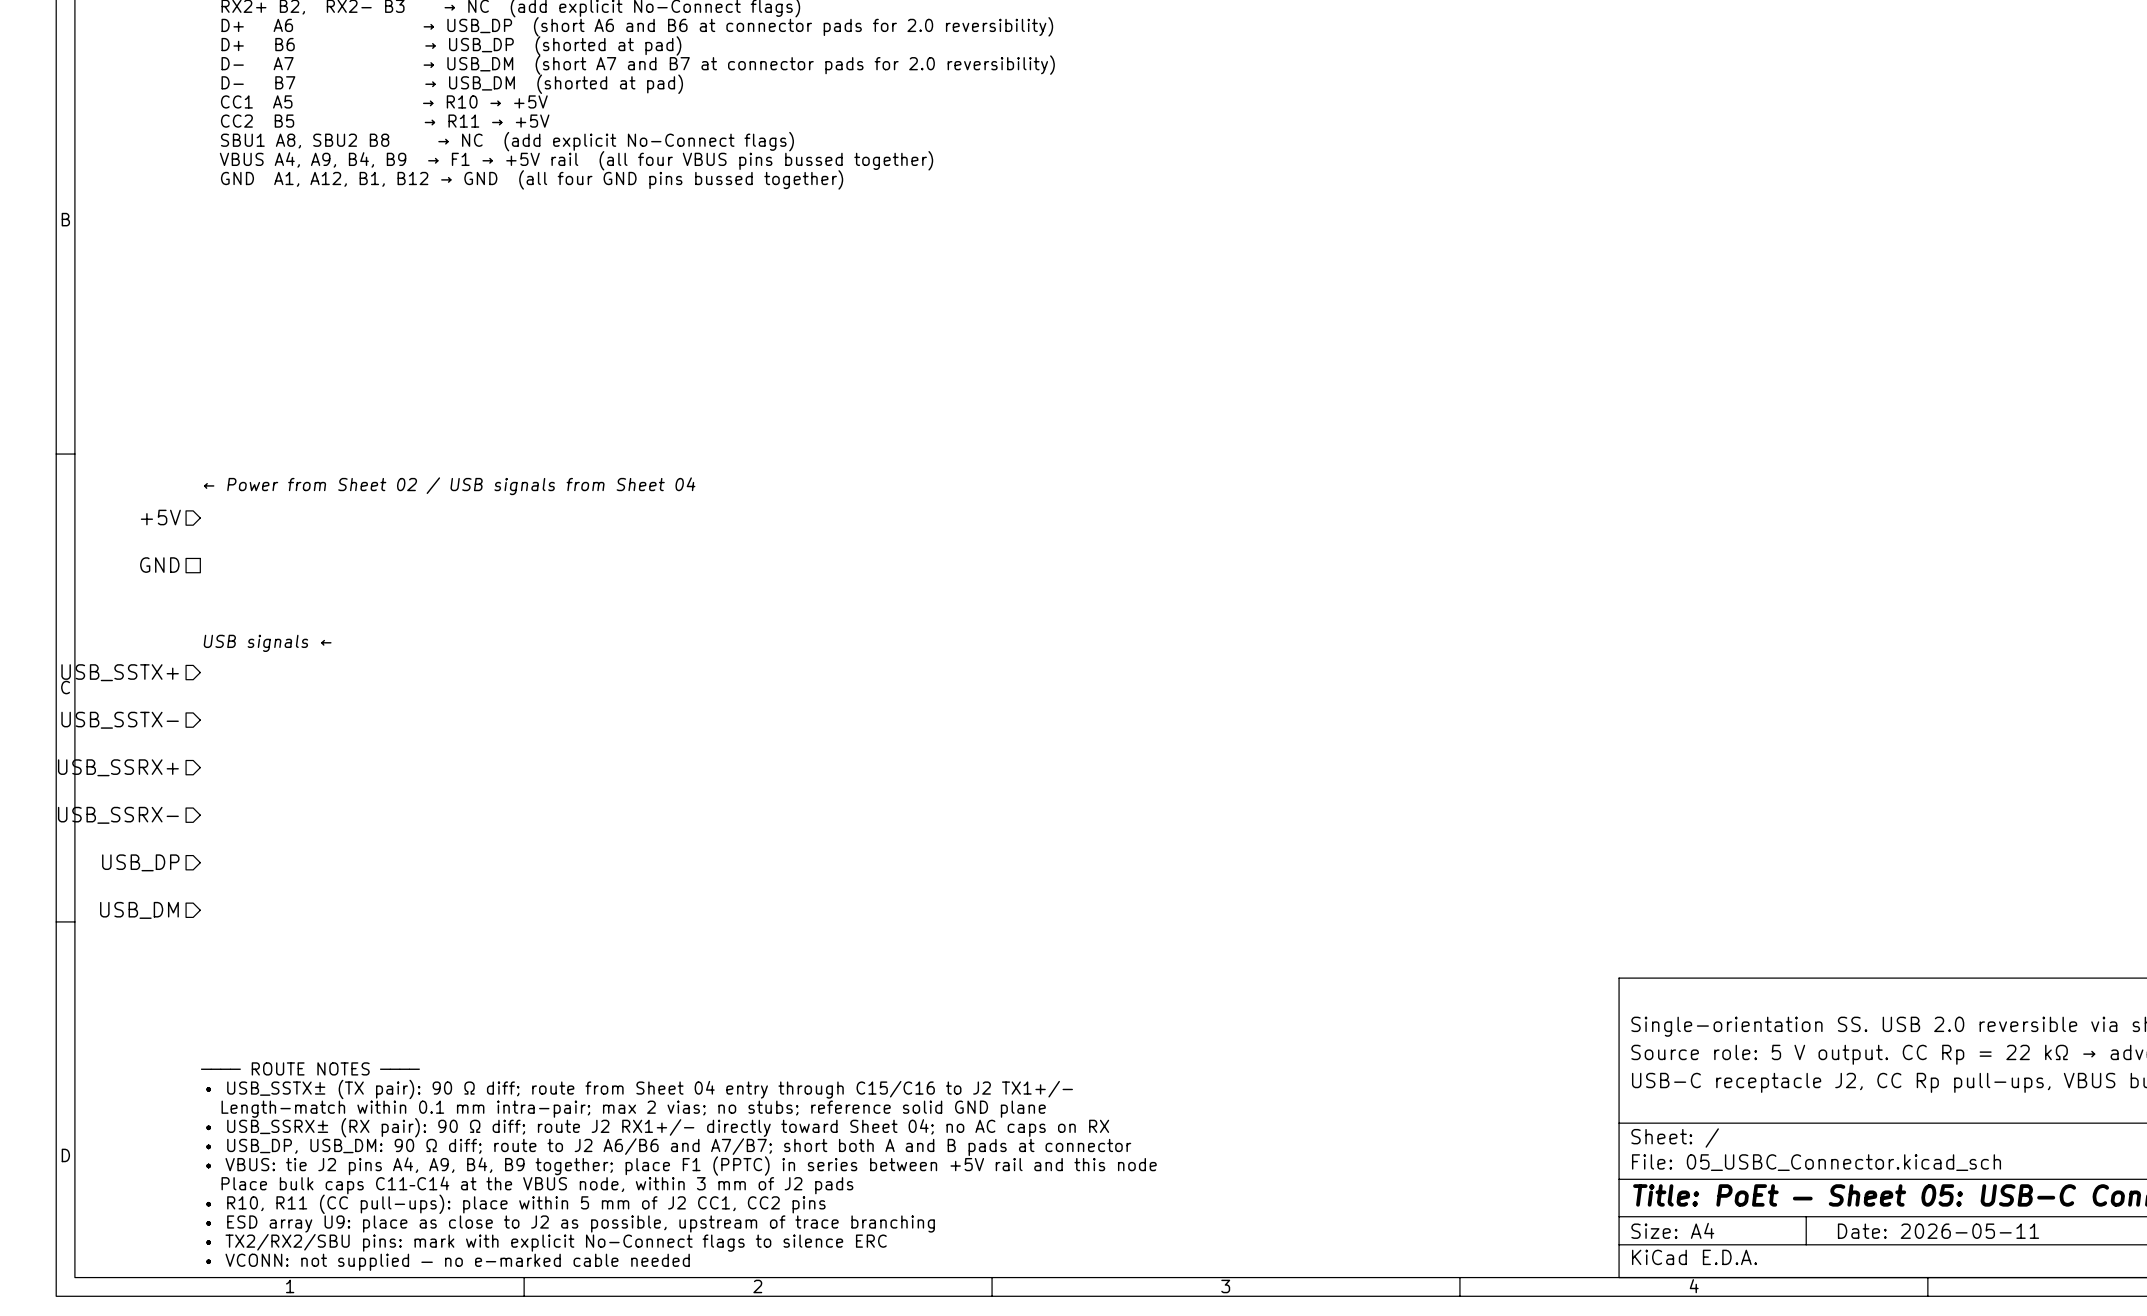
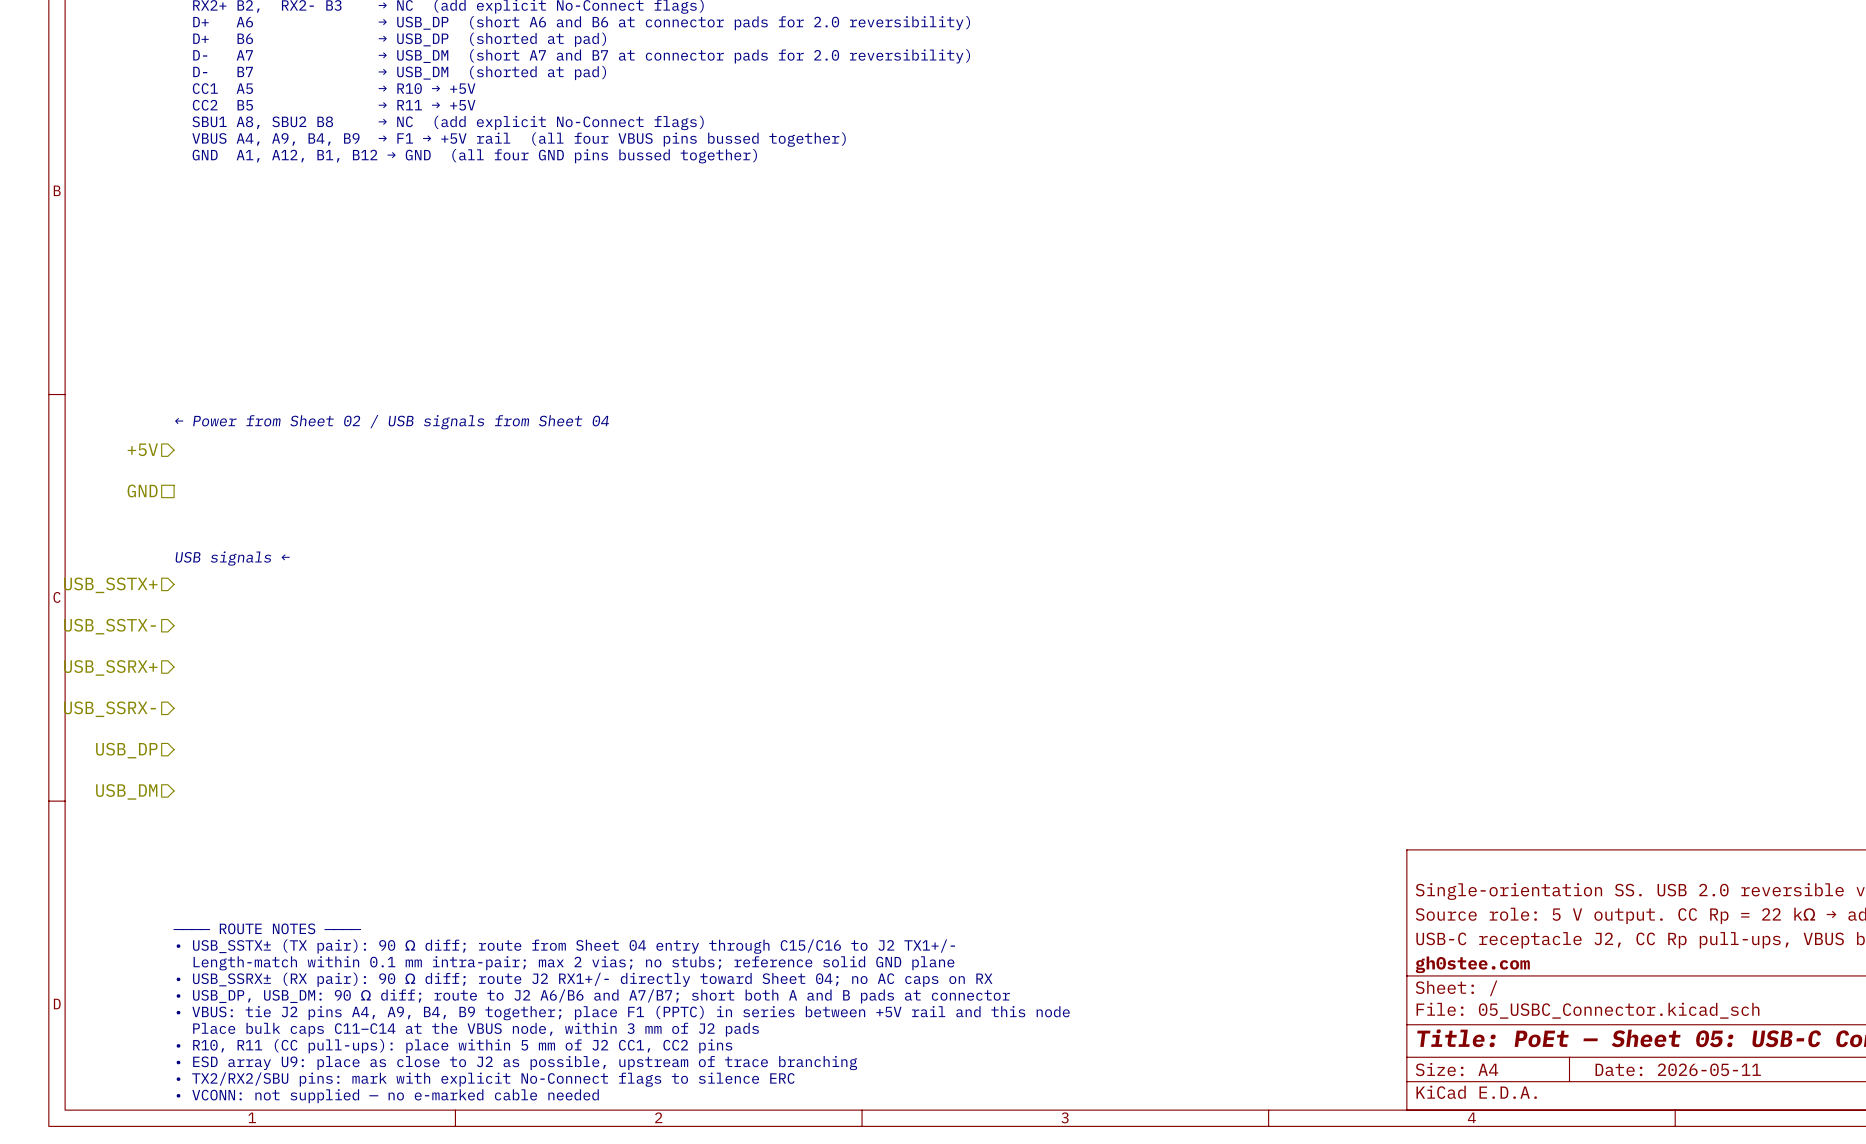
title block: none -> gh0stee.com (1472, 964)

